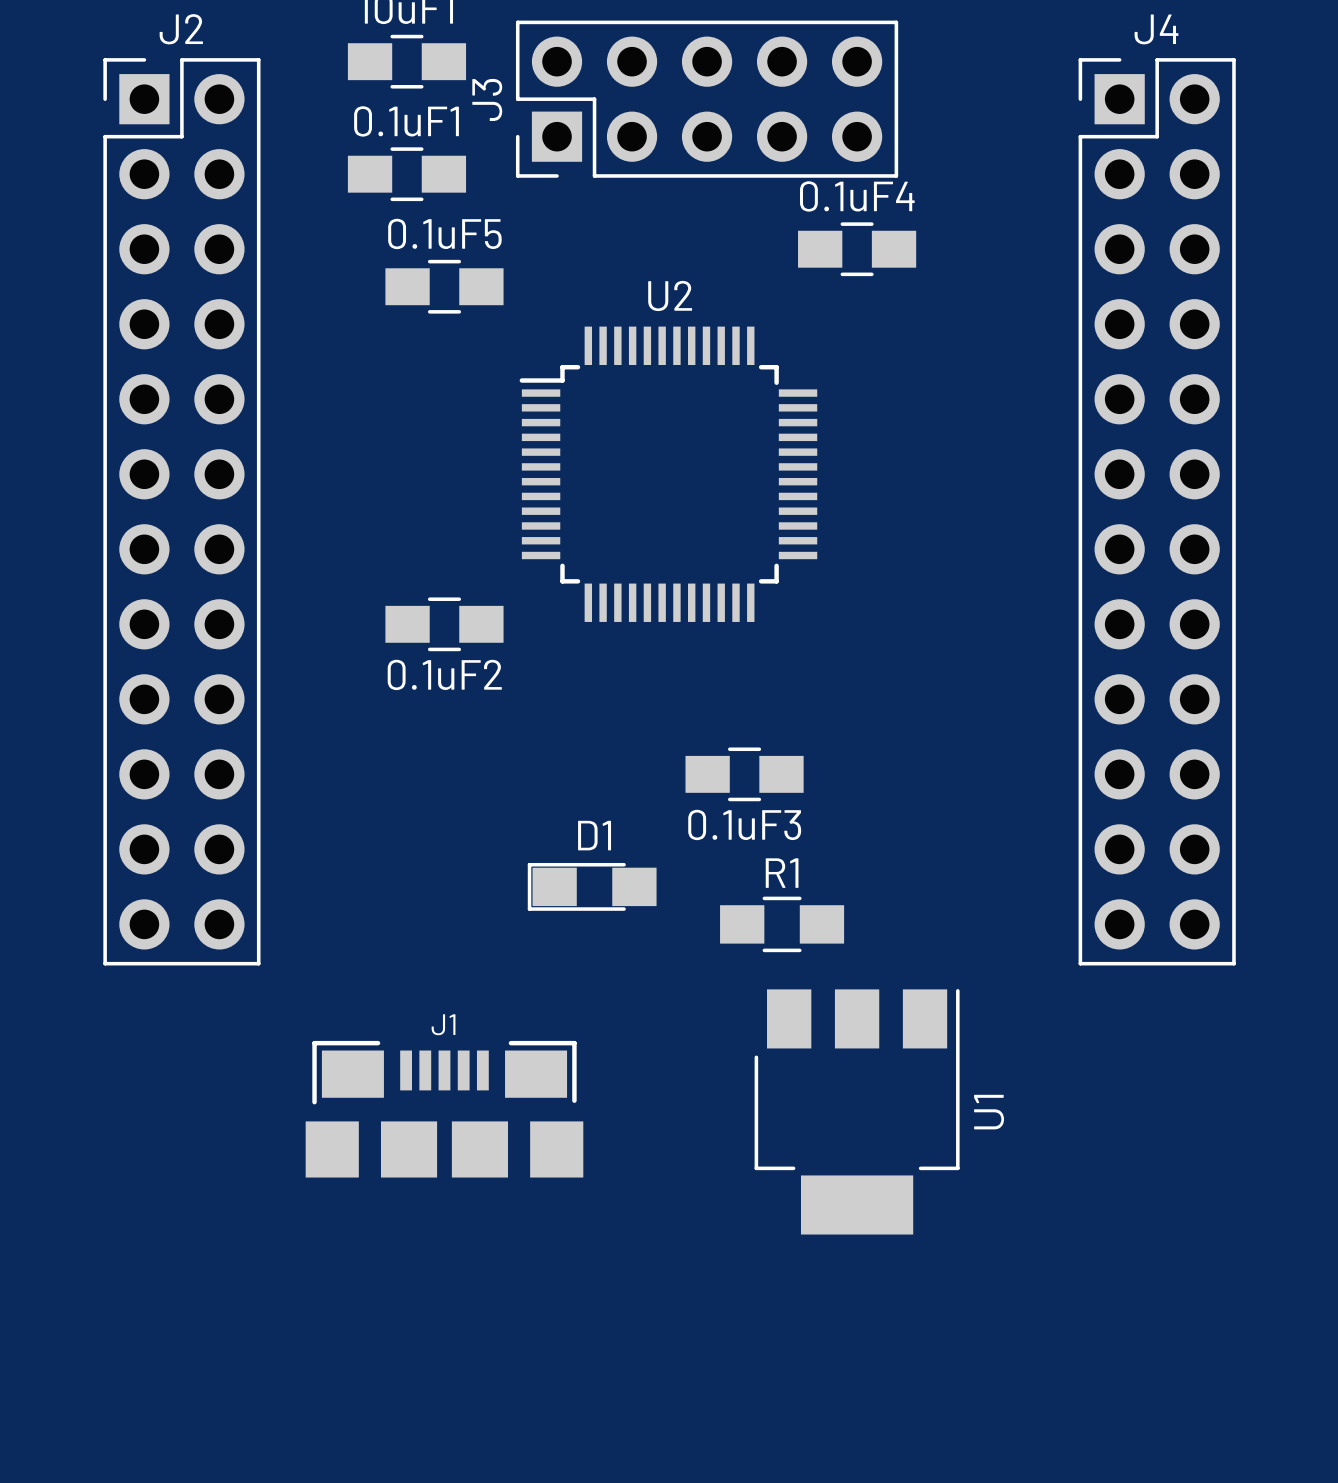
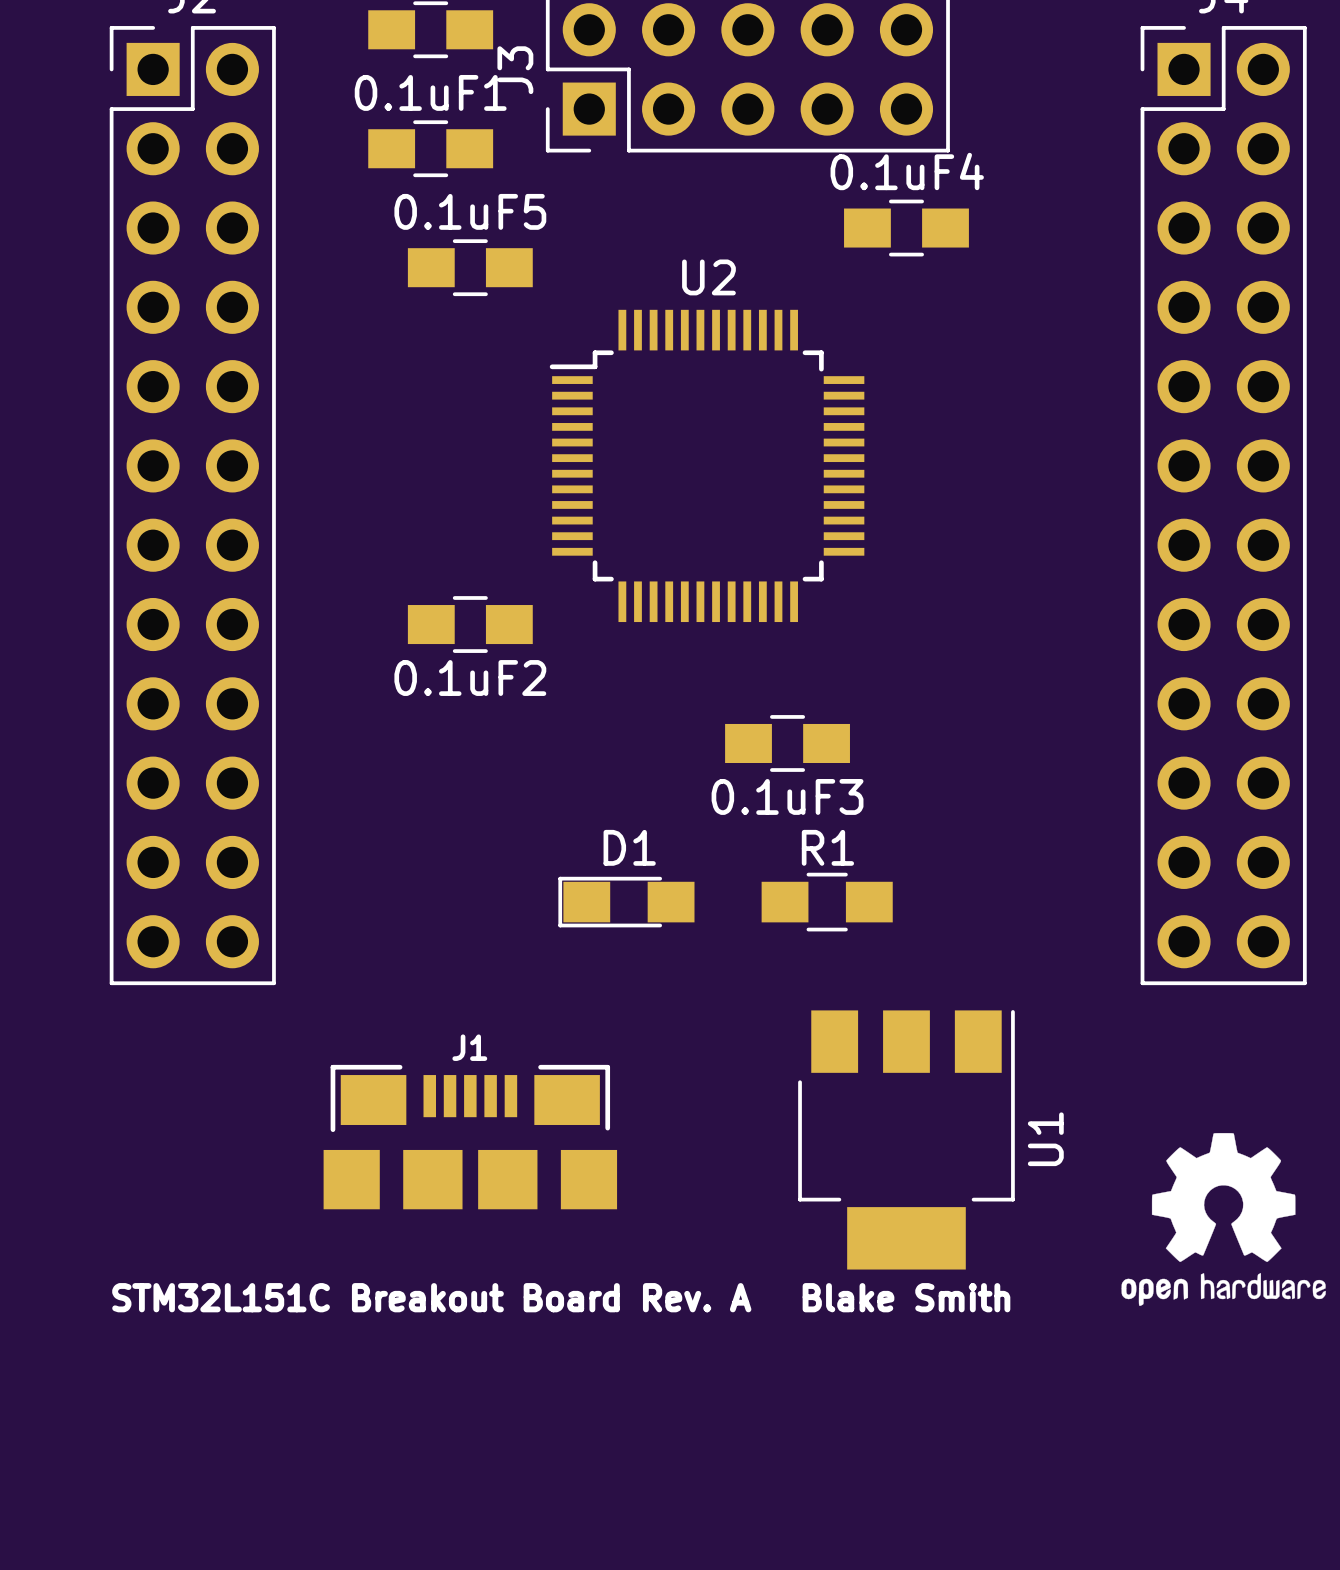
0.1uF3 position: (744, 774) -> (787, 743)
R1 position: (782, 924) -> (827, 902)
drawing: none -> [1121, 1133, 1326, 1306]
text: none -> STM32L151C Breakout Board Rev. A (431, 1297)
text: none -> Blake Smith (906, 1297)

